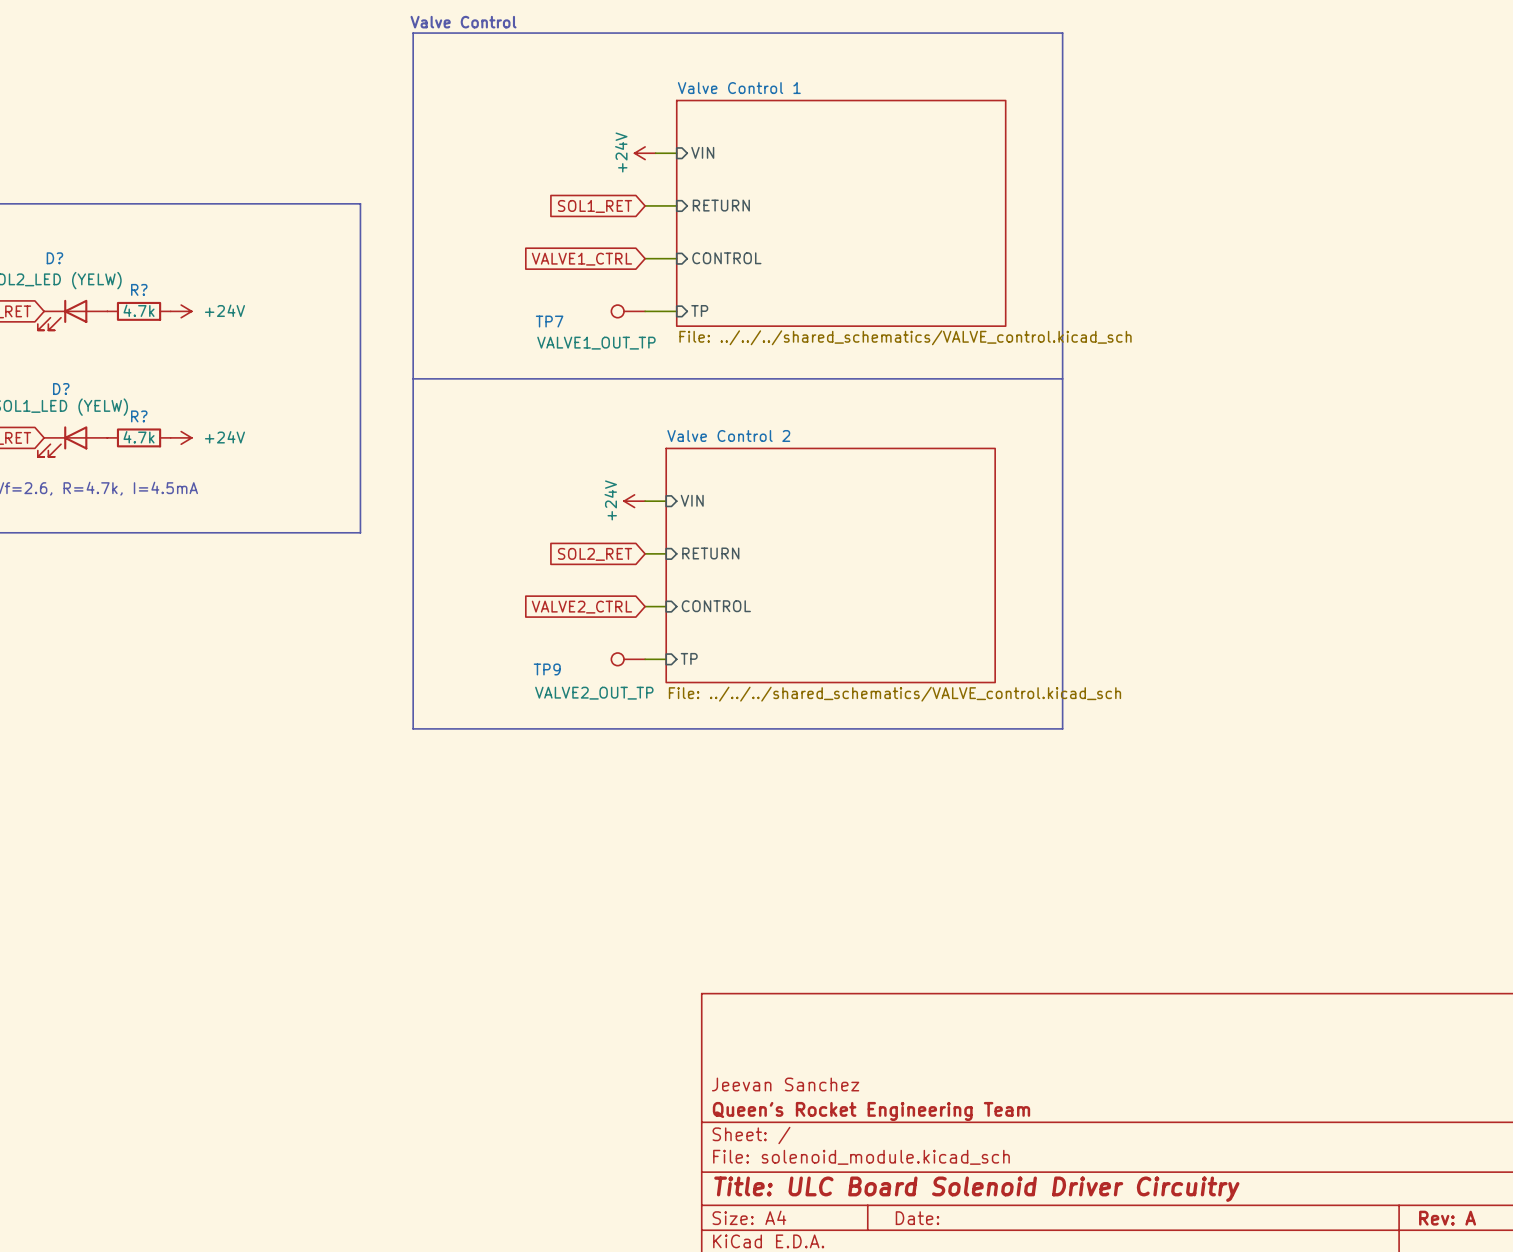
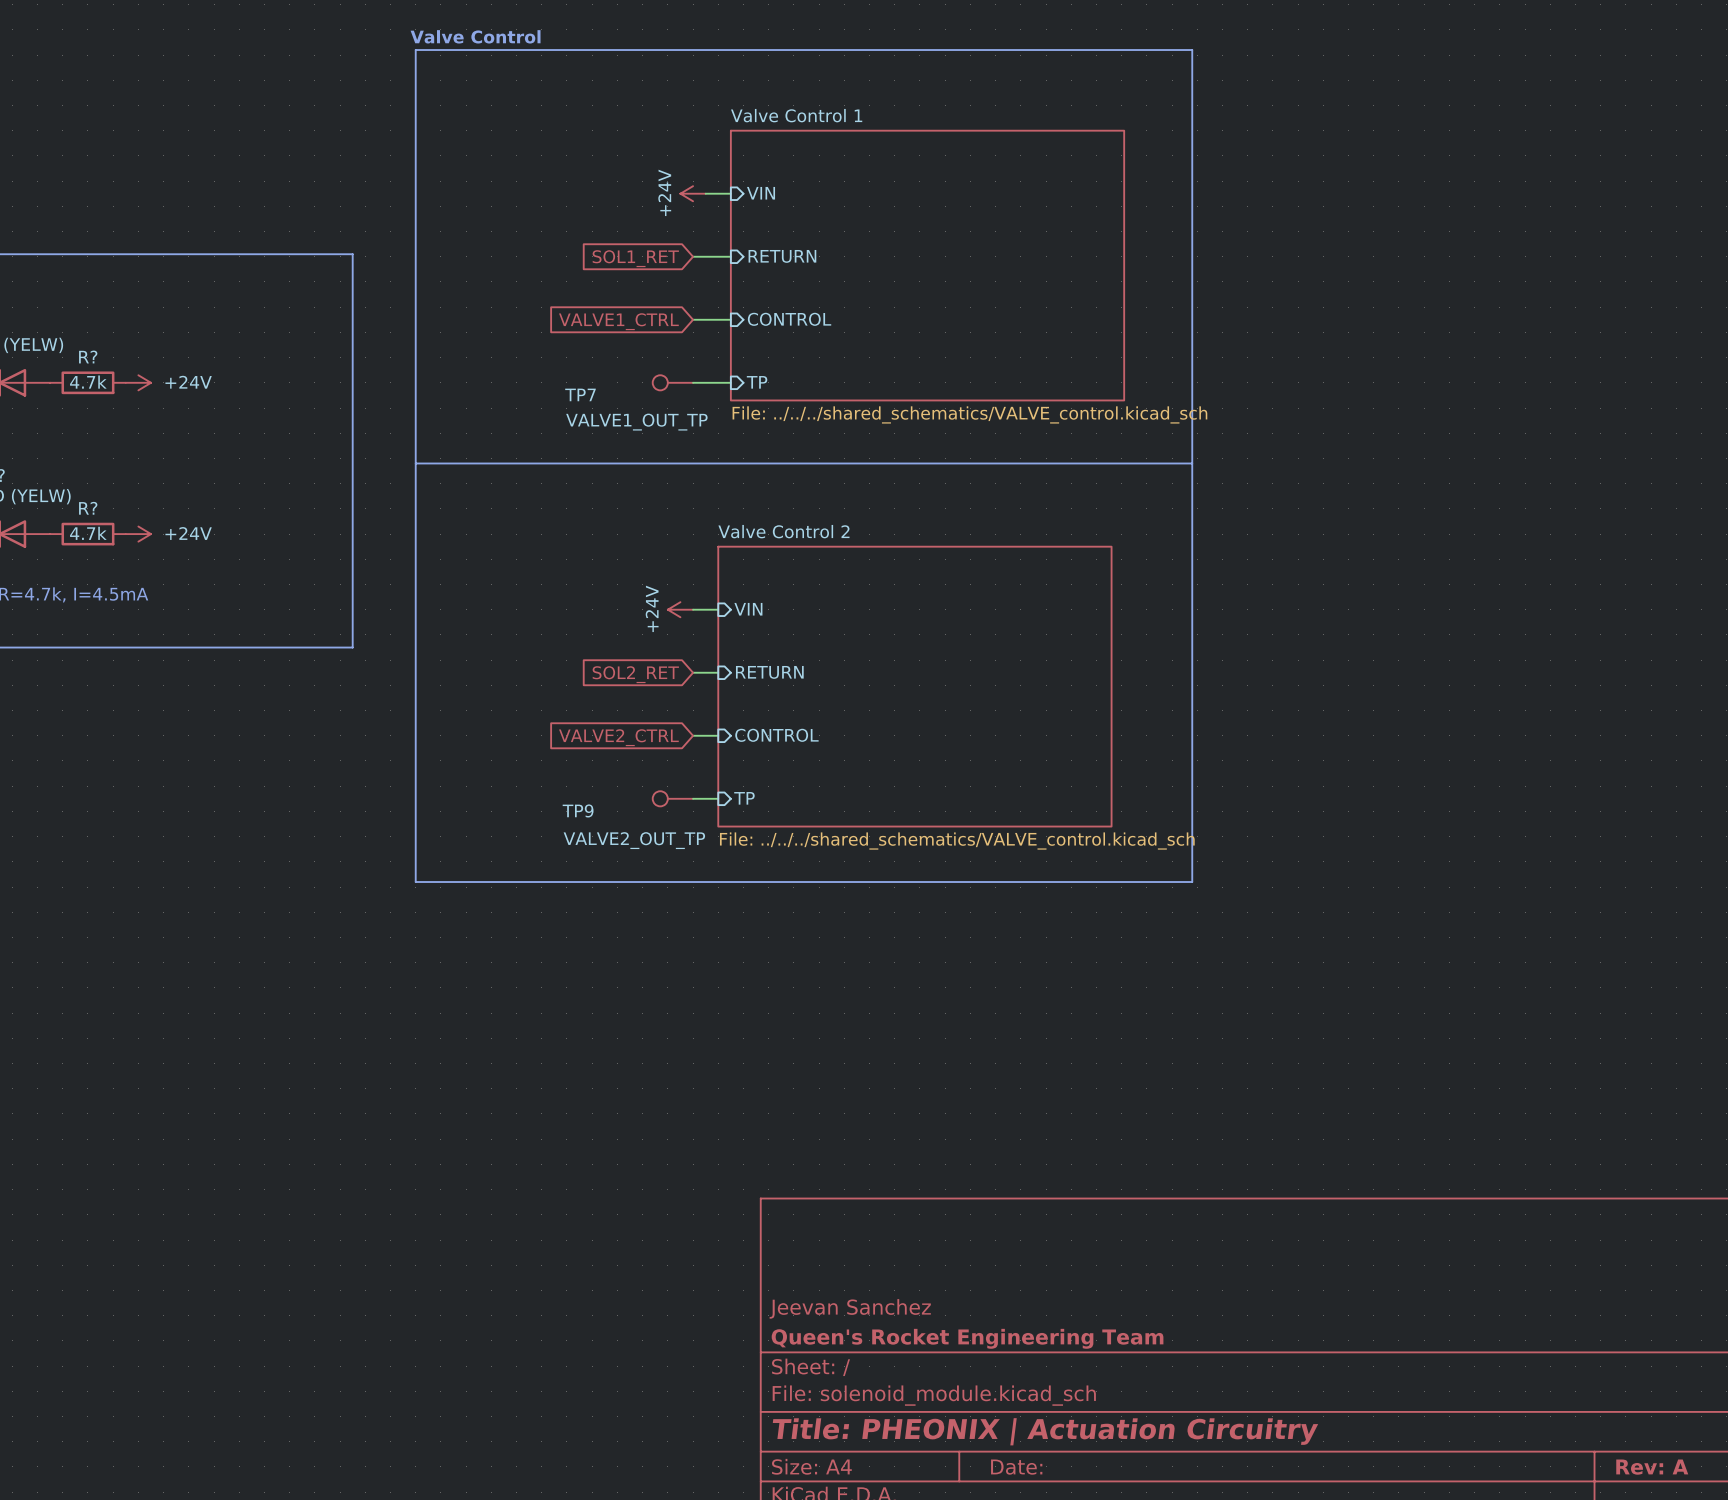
title block: Title: ULC Board Solenoid Driver Circuitry (976, 1189) -> Title: PHEONIX | Actuation Circuitry (1045, 1431)

